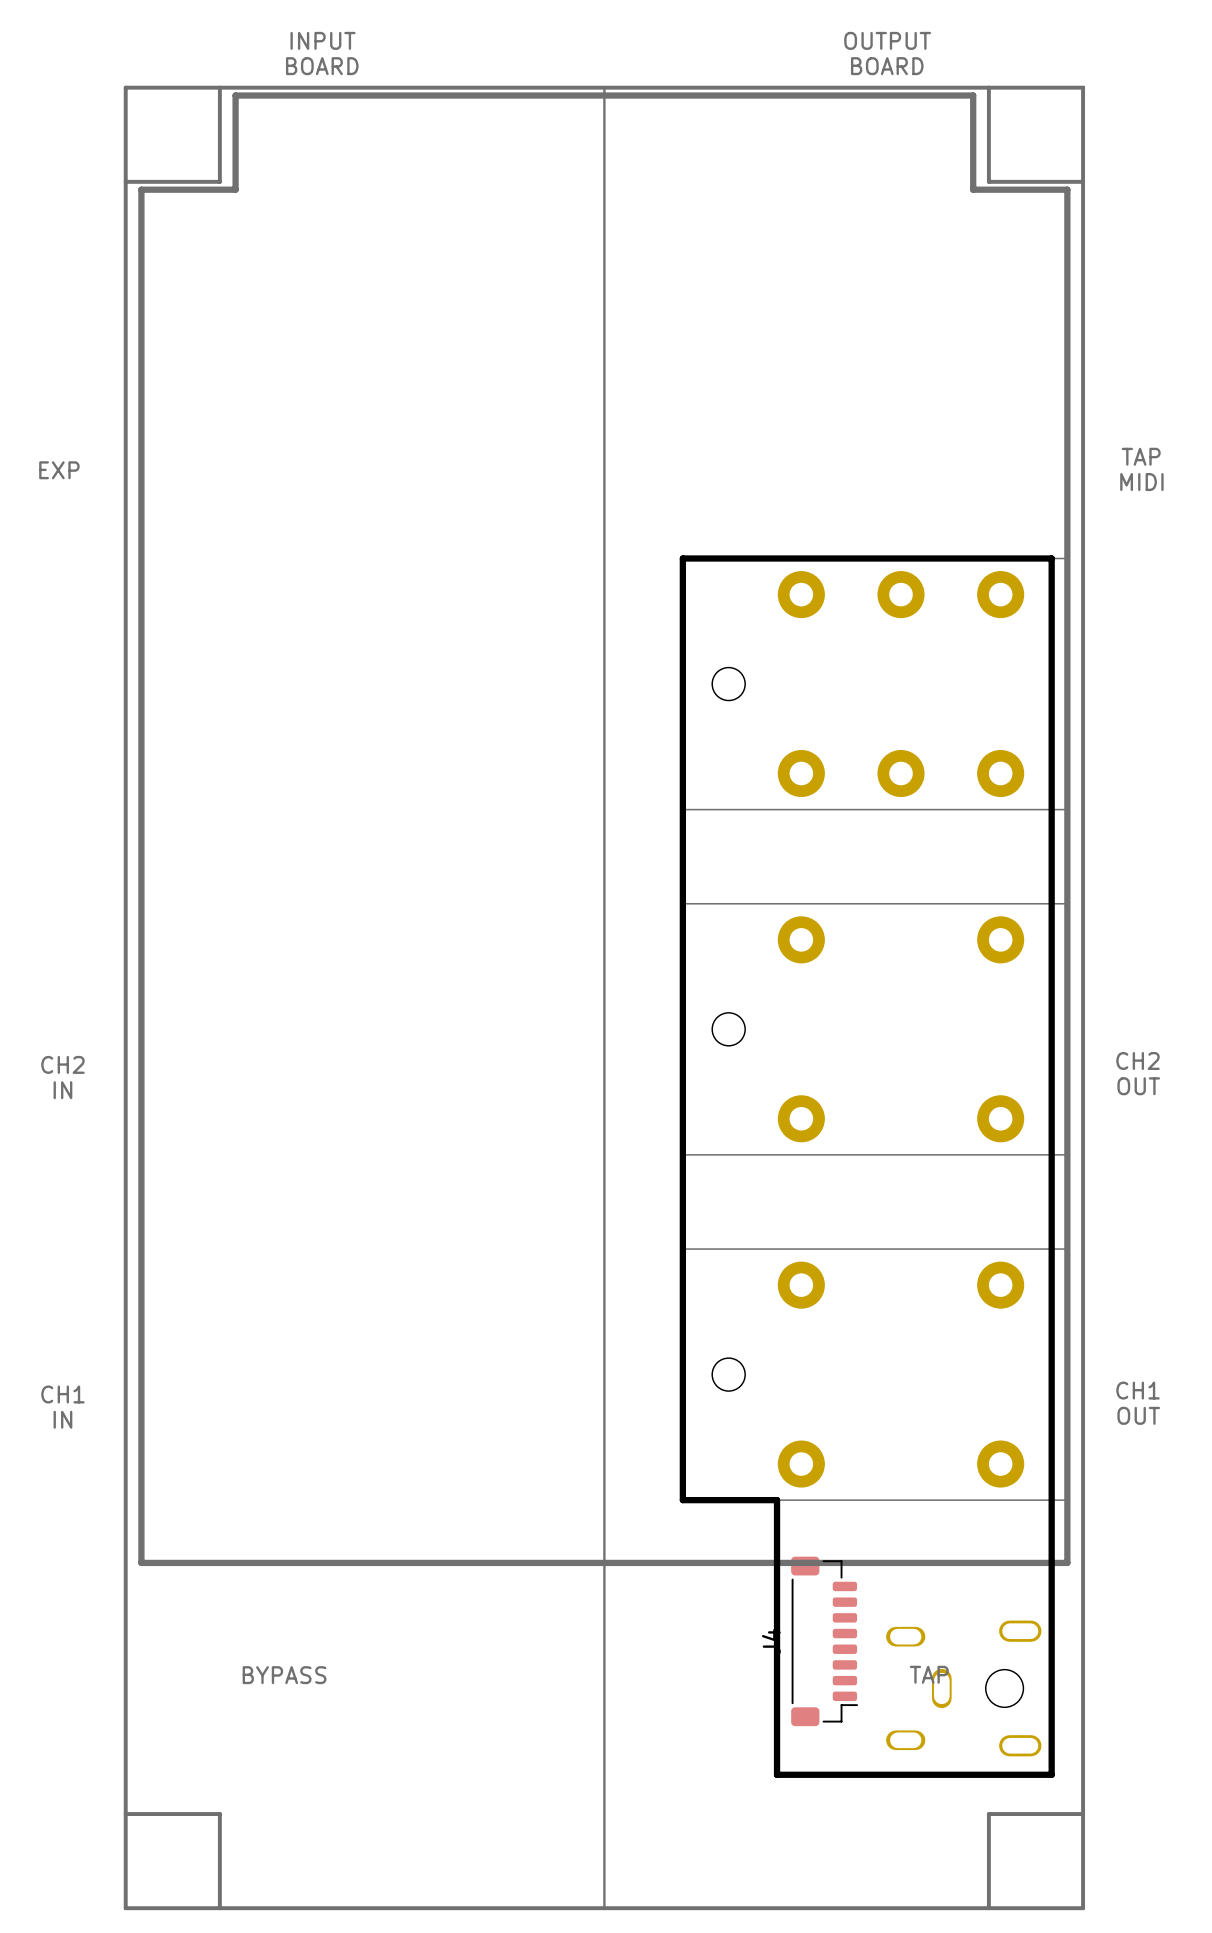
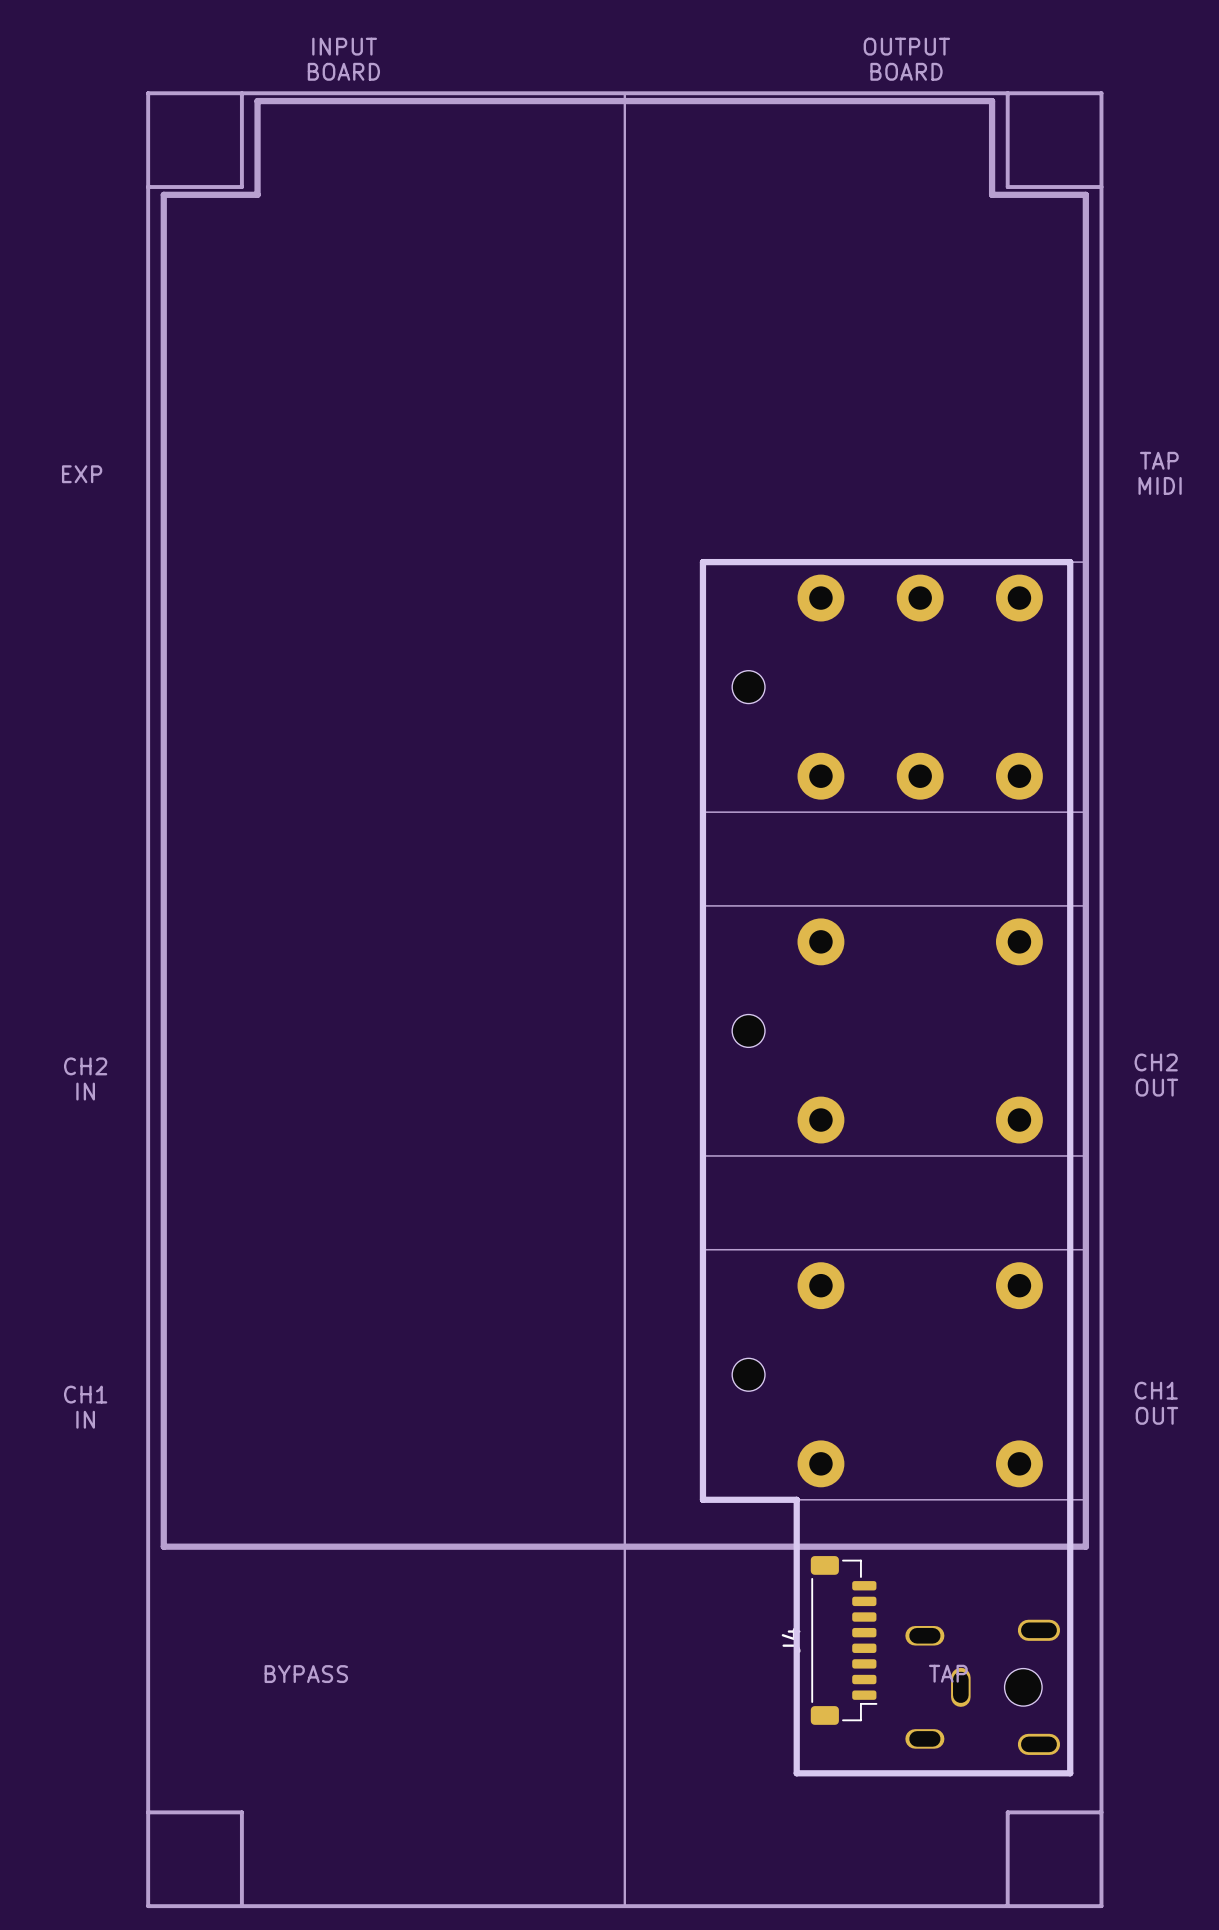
line: (141, 1547) (141, 1562) (1067, 1562) (1067, 1547) -> (163, 1546) (1085, 1546)

